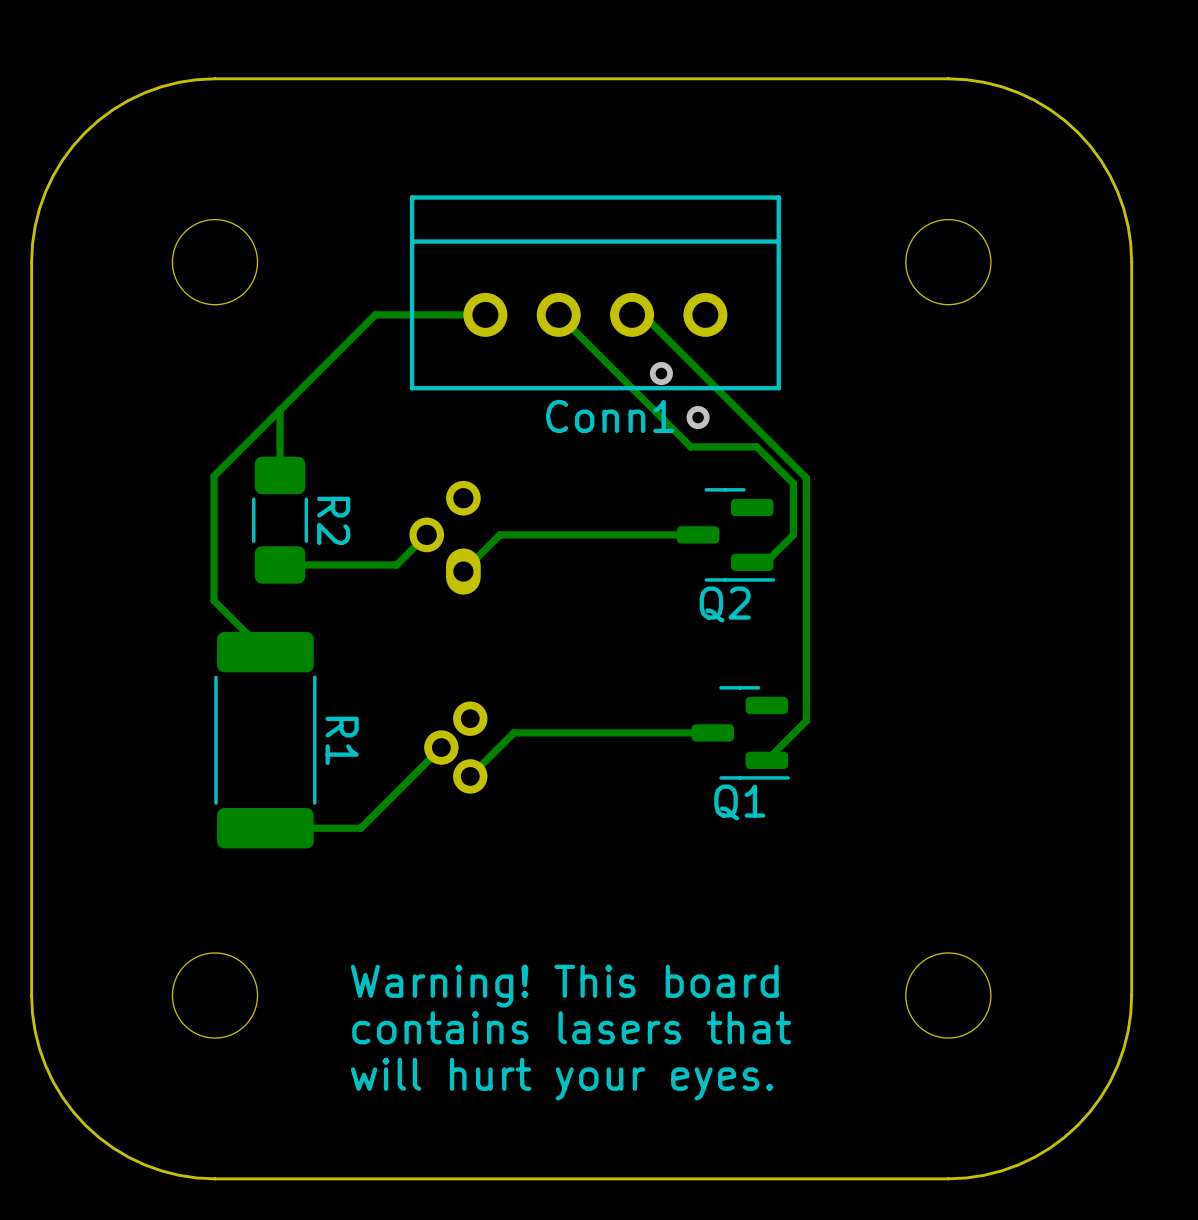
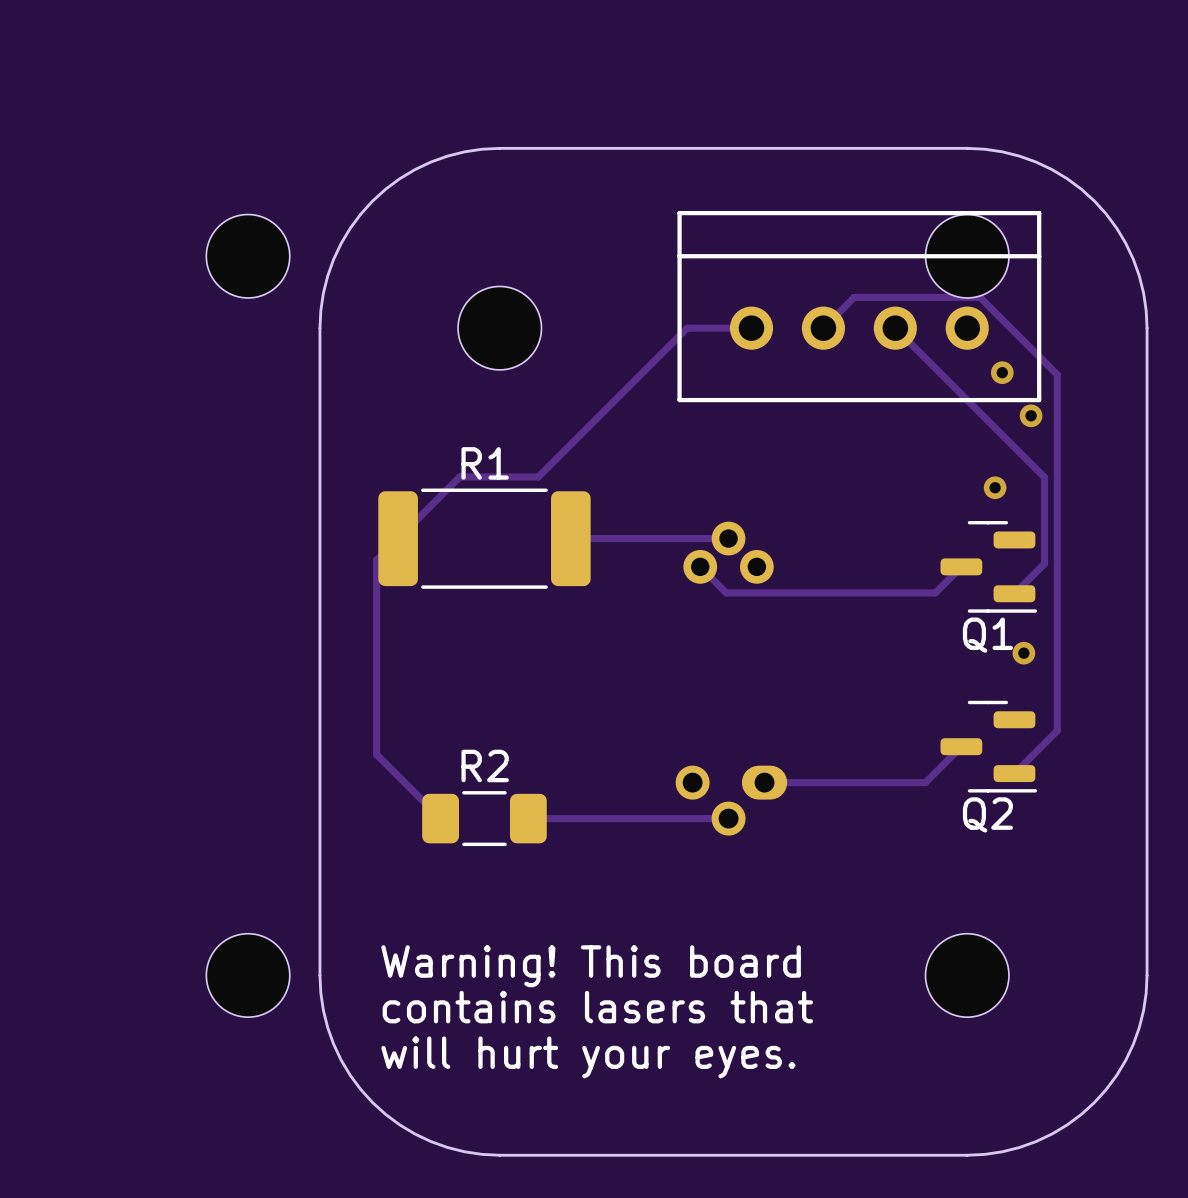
Conn1: (595, 292) -> none
part: none -> (859, 306)
track: (485, 314) (375, 314) (214, 476) (214, 600) (265, 652) -> none
track: (558, 314) (690, 446) (756, 446) (793, 483) (793, 534) (765, 562) (752, 562) -> none
track: (632, 314) (643, 314) (806, 478) (806, 720) (766, 760) -> none
part: none -> (499, 328)
track: none -> (751, 328) (687, 328) (538, 476) (459, 476) (376, 560) (376, 754) (440, 818)
track: none -> (823, 328) (854, 297) (980, 297) (1057, 374) (1057, 730) (1014, 773)
track: none -> (895, 328) (1044, 477) (1044, 563) (1014, 593)
board edge: (1131, 335) (1130, 244) (1123, 208) (1110, 175) (1090, 145) (1077, 132) (1050, 109) (1018, 92) (984, 82) (948, 78) (196, 79) (161, 86) (128, 100) (98, 120) (73, 145) (53, 175) (39, 208) (32, 244) (31, 262) (31, 995) (35, 1031) (45, 1065) (62, 1097) (85, 1125) (98, 1137) (128, 1157) (161, 1170) (196, 1177) (214, 1178) (471, 1178) -> (1147, 328) (1143, 293) (1133, 259) (1116, 228) (1094, 201) (1081, 189) (1052, 169) (1019, 156) (984, 149) (482, 149) (447, 156) (415, 169) (385, 189) (360, 214) (350, 228) (333, 259) (323, 293) (320, 310) (320, 993) (327, 1027) (341, 1060) (360, 1089) (385, 1114) (415, 1134) (447, 1147) (482, 1154) (499, 1155)
via: (661, 373) -> none
via: none -> (1002, 372)
track: (280, 410) (280, 475) -> none
via: (698, 417) -> none
via: none -> (1031, 415)
via: none -> (995, 487)
R2 rotation: 0° (280, 520) -> 90° clockwise (484, 818)
R2 position: (280, 520) -> (484, 818)
R2 name position: R2 (333, 520) -> R2 (485, 765)
track: (426, 534) (396, 564) (280, 564) -> none
track: (698, 534) (500, 534) (463, 571) -> none
Q2 position: (726, 534) -> (988, 746)
part rotation: 0° (445, 537) -> 90° counterclockwise (731, 800)
part position: (445, 537) -> (731, 800)
track: none -> (728, 538) (570, 538)
track: none -> (961, 566) (935, 592) (726, 592) (700, 566)
via: none -> (1023, 653)
track: (712, 732) (513, 732) (470, 776) -> none
Q1 position: (740, 732) -> (988, 566)
R1 rotation: 0° (265, 740) -> 90° clockwise (484, 538)
R1 position: (265, 740) -> (484, 538)
R1 name position: R1 (342, 740) -> R1 (485, 463)
track: (441, 747) (360, 828) (265, 828) -> none
part rotation: 0° (455, 747) -> 90° clockwise (728, 552)
part position: (455, 747) -> (728, 552)
track: none -> (961, 746) (925, 782) (764, 782)
track: none -> (728, 818) (528, 818)

